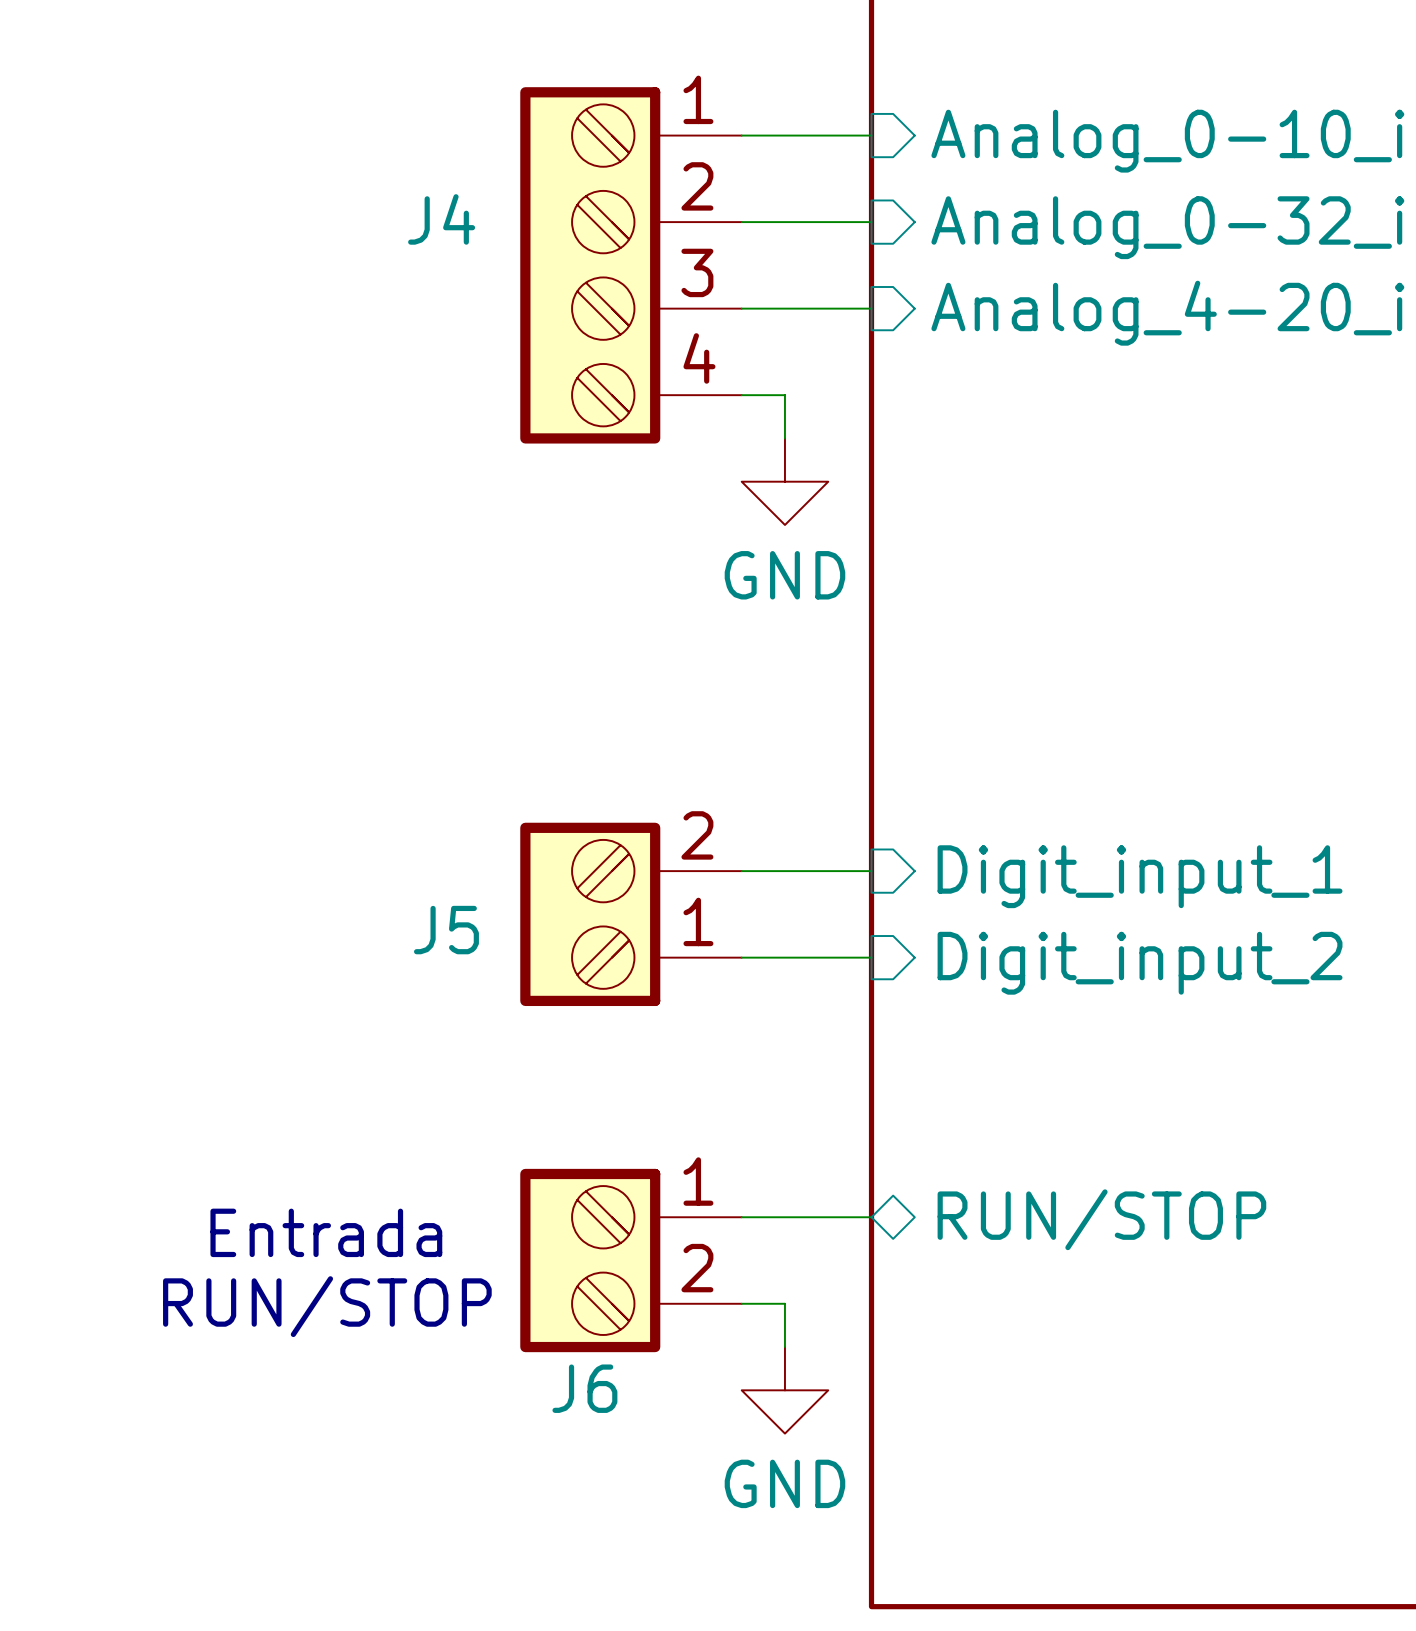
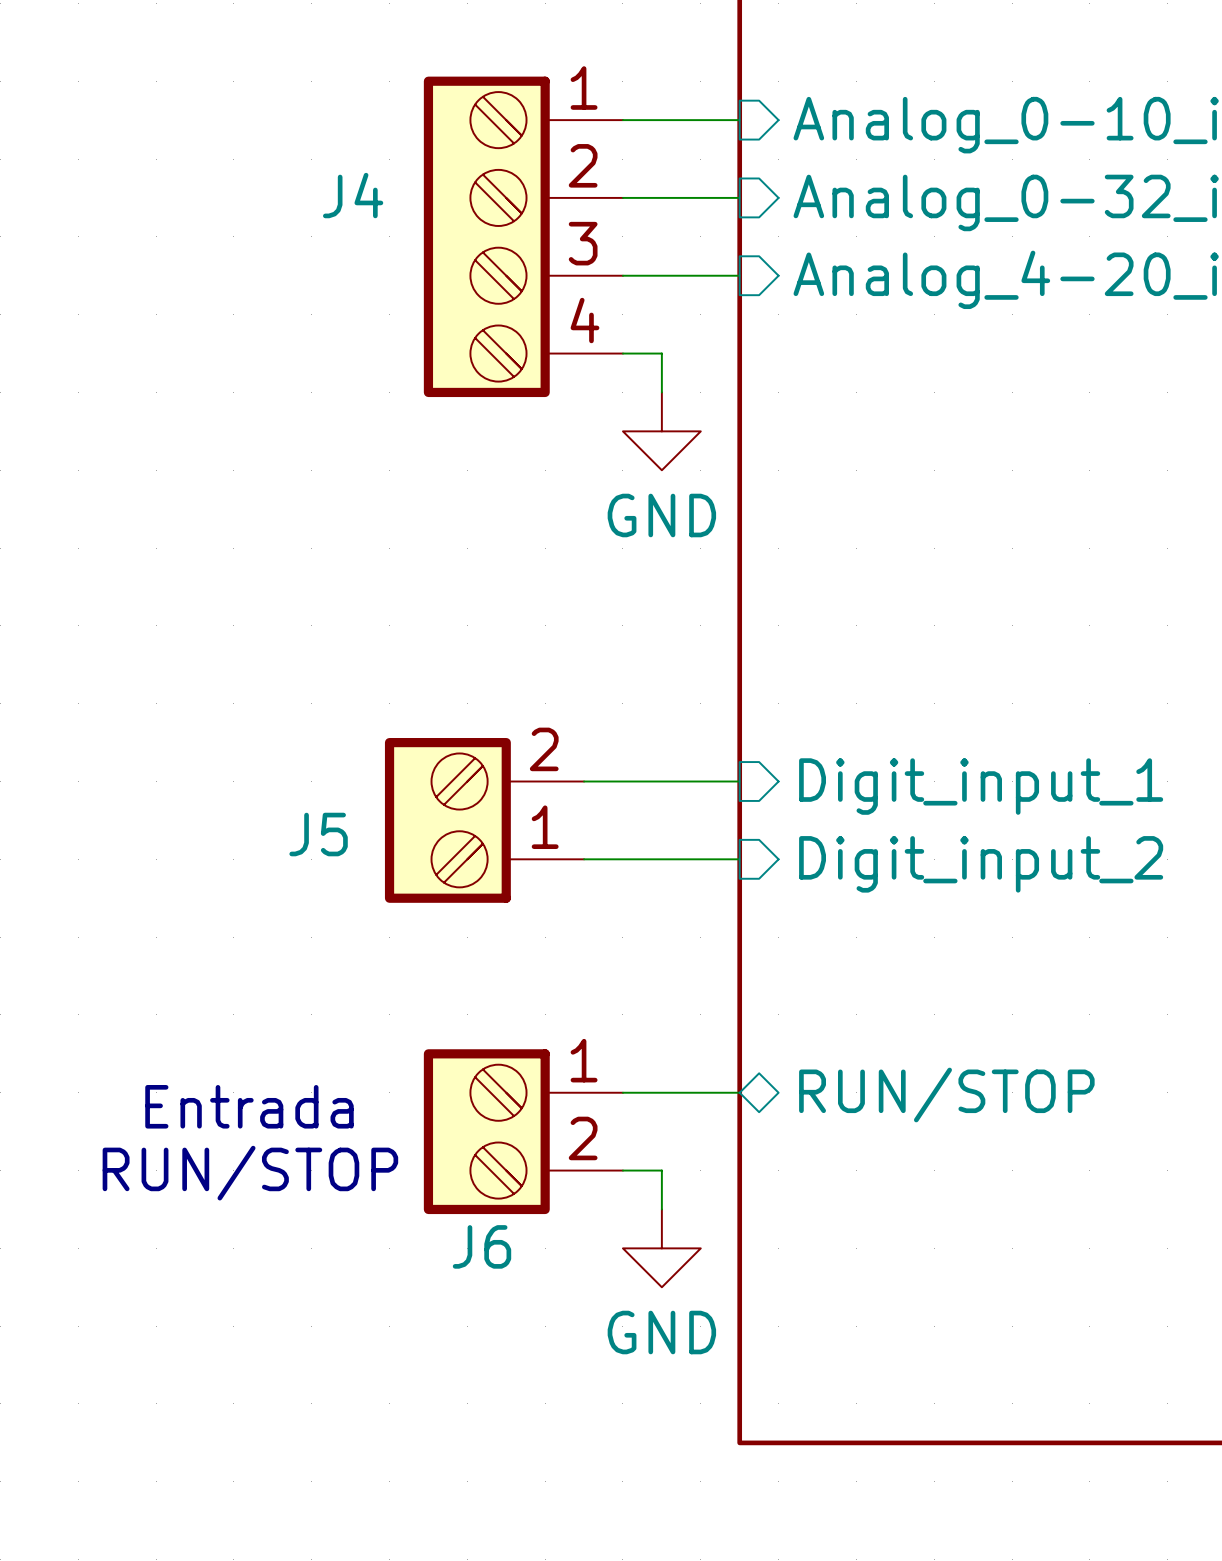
J5 position: (630, 914) -> (484, 820)

